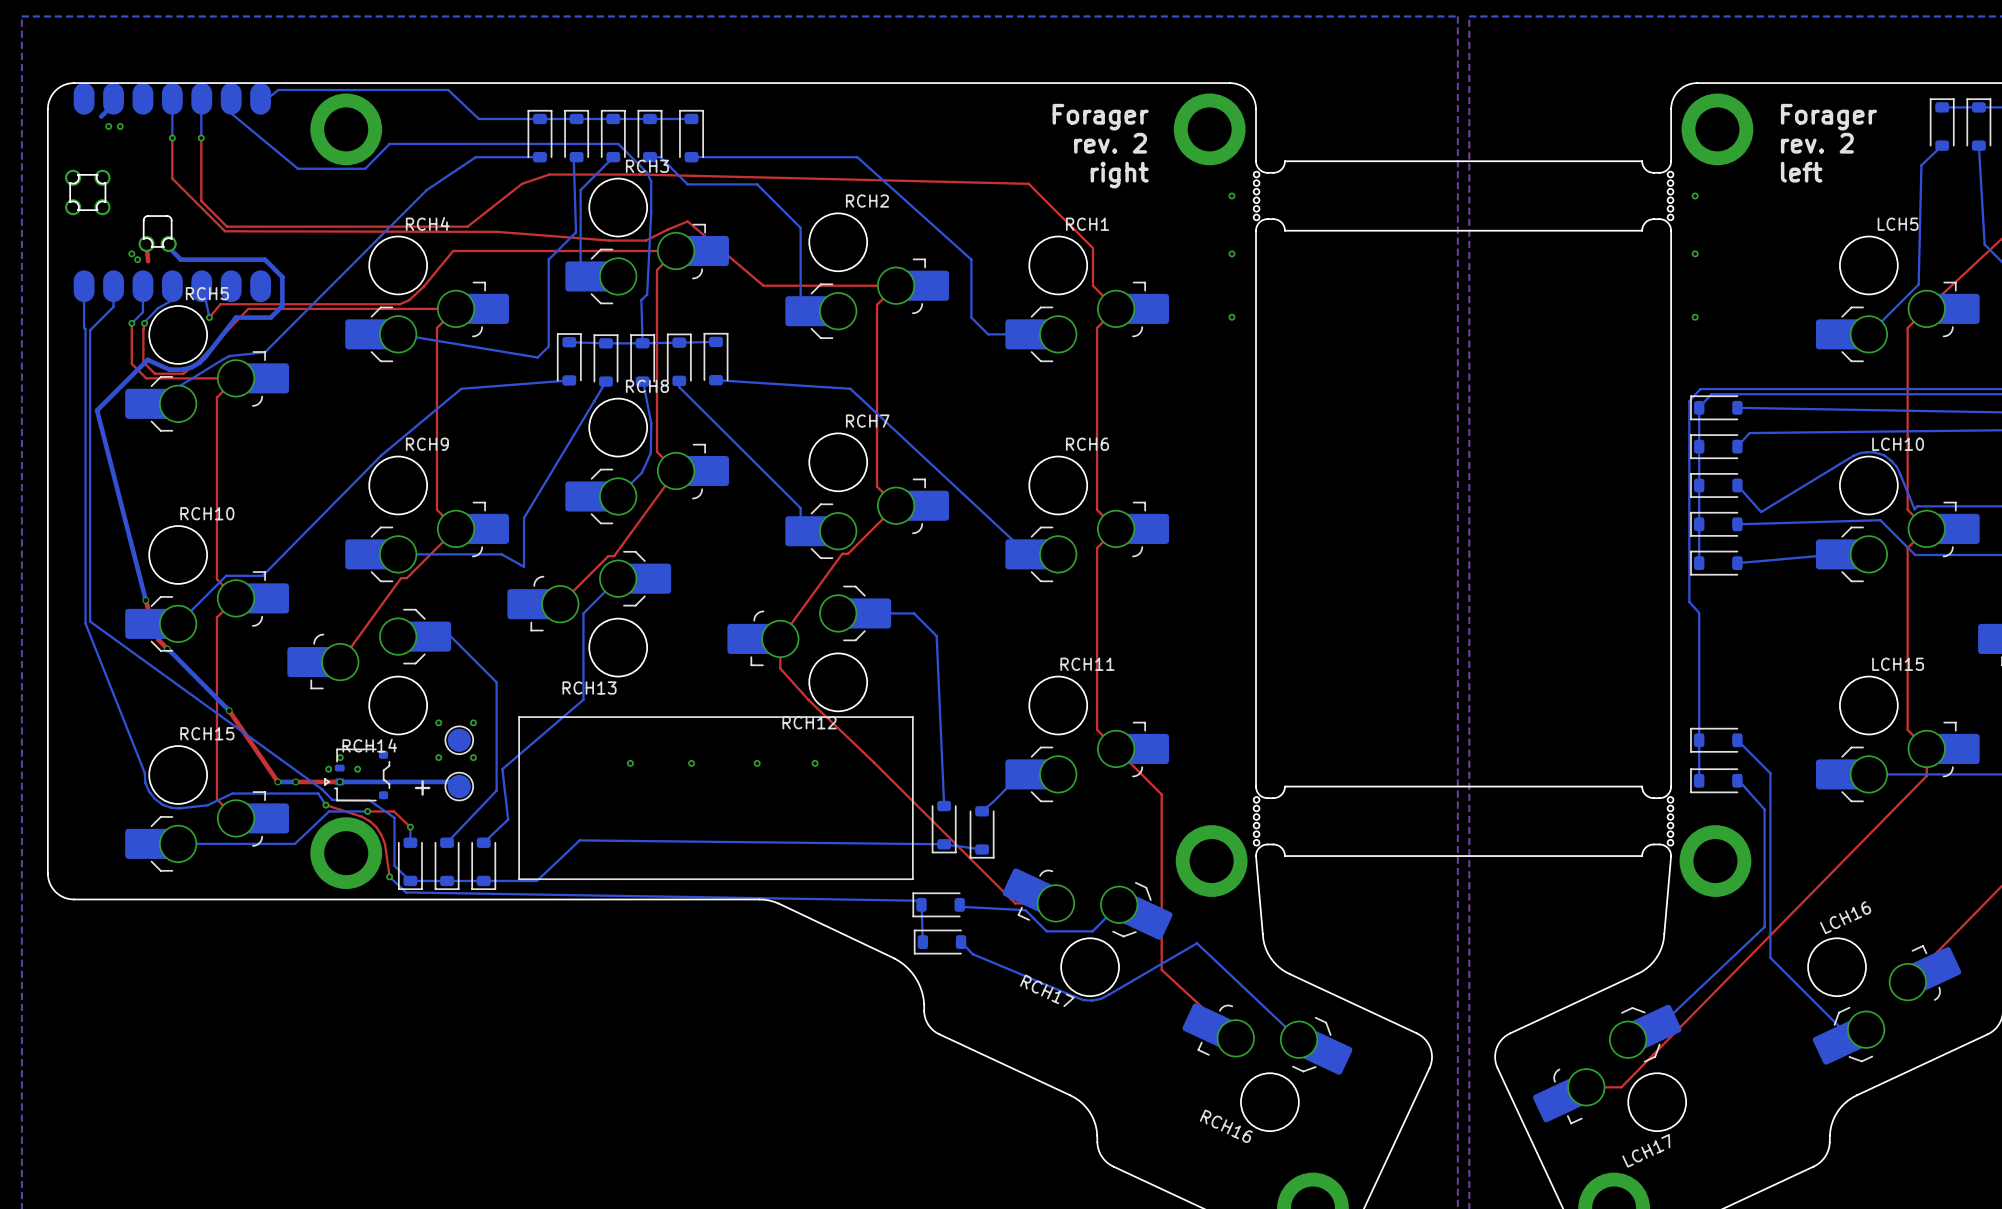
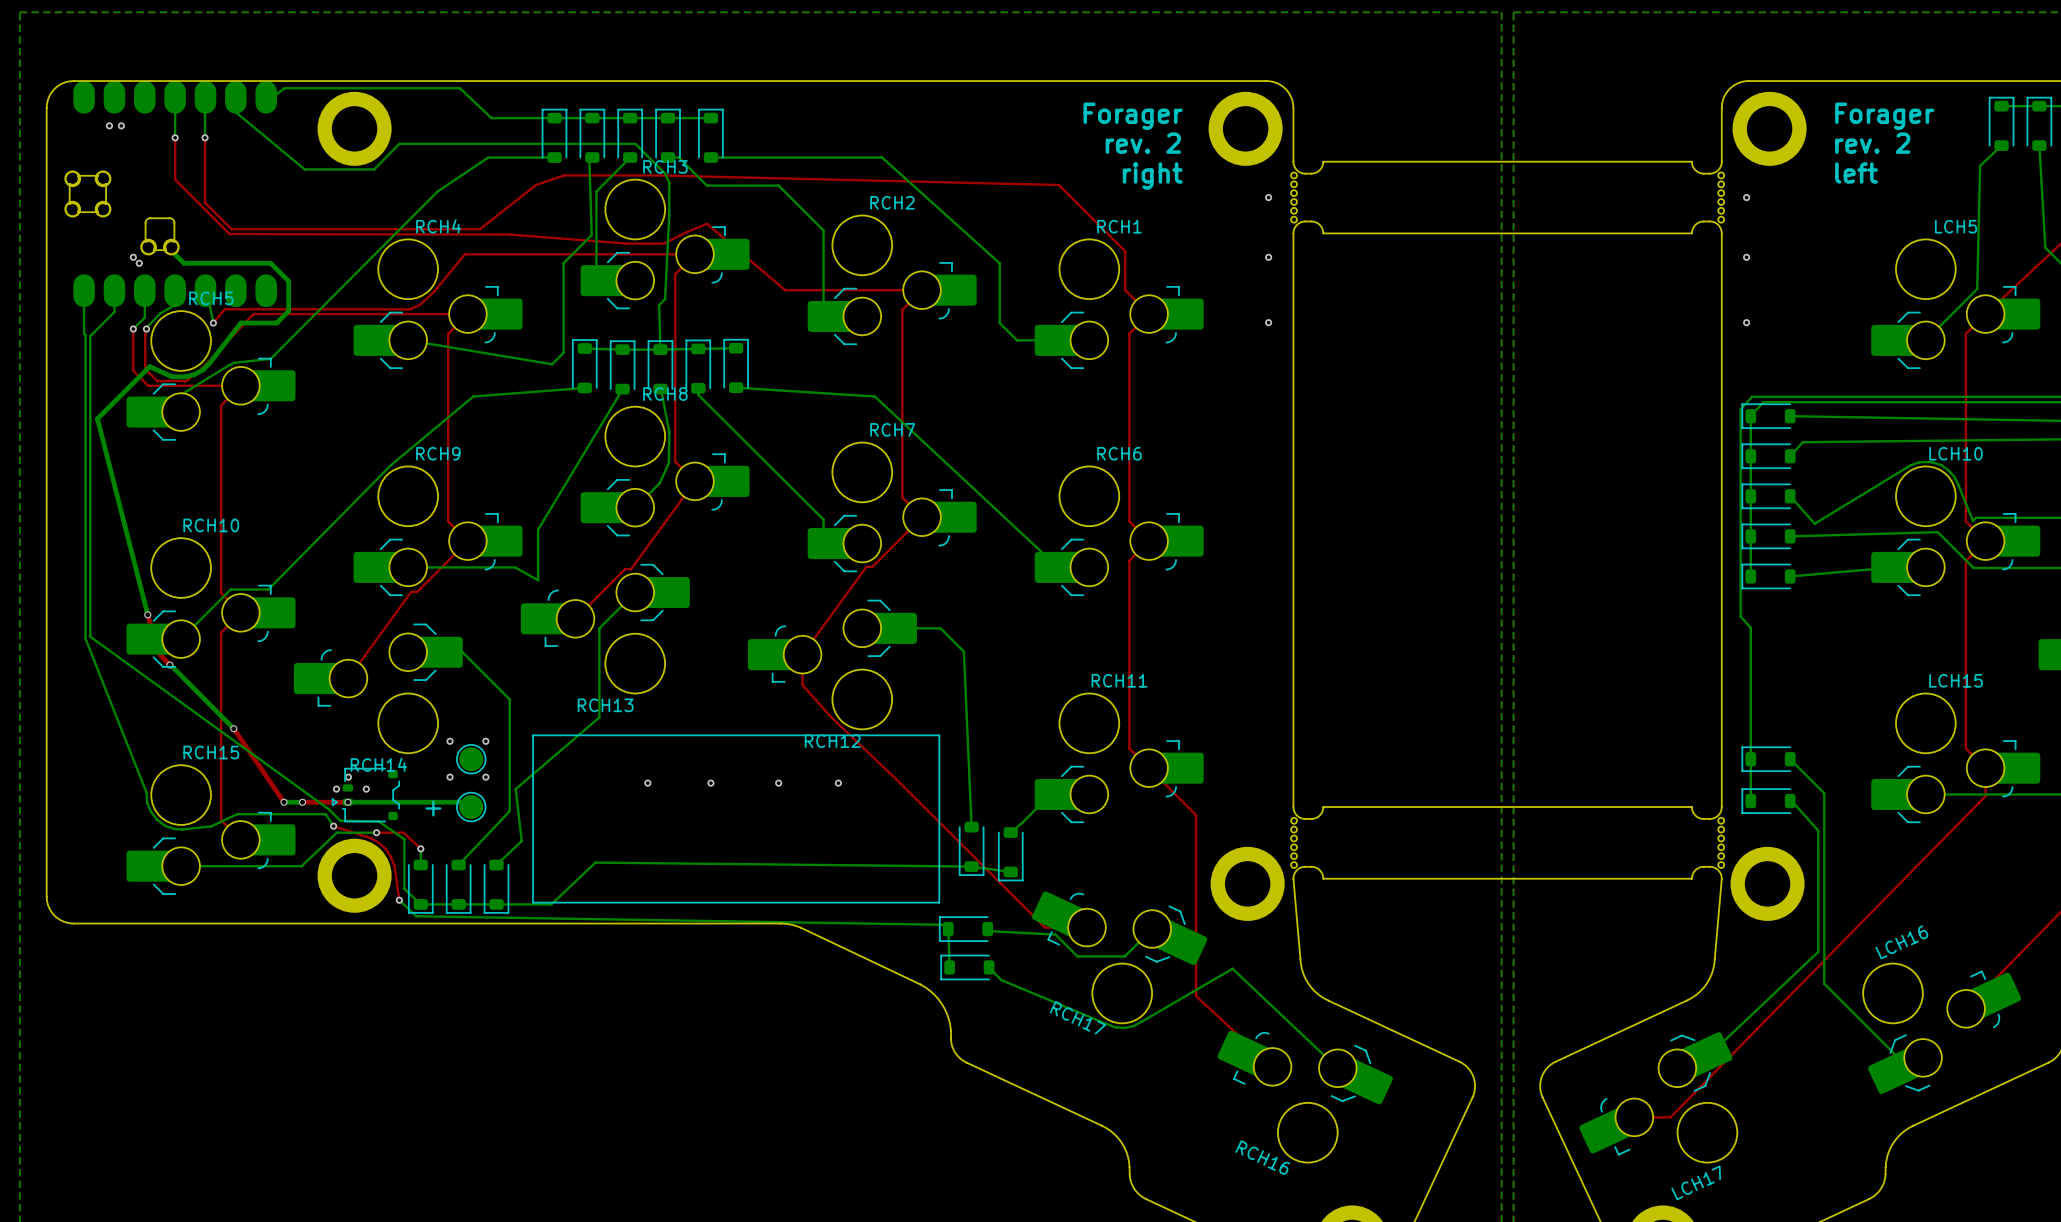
bottom track: (113, 104) (101, 116) -> none
top track: (146, 243) (148, 261) -> none

